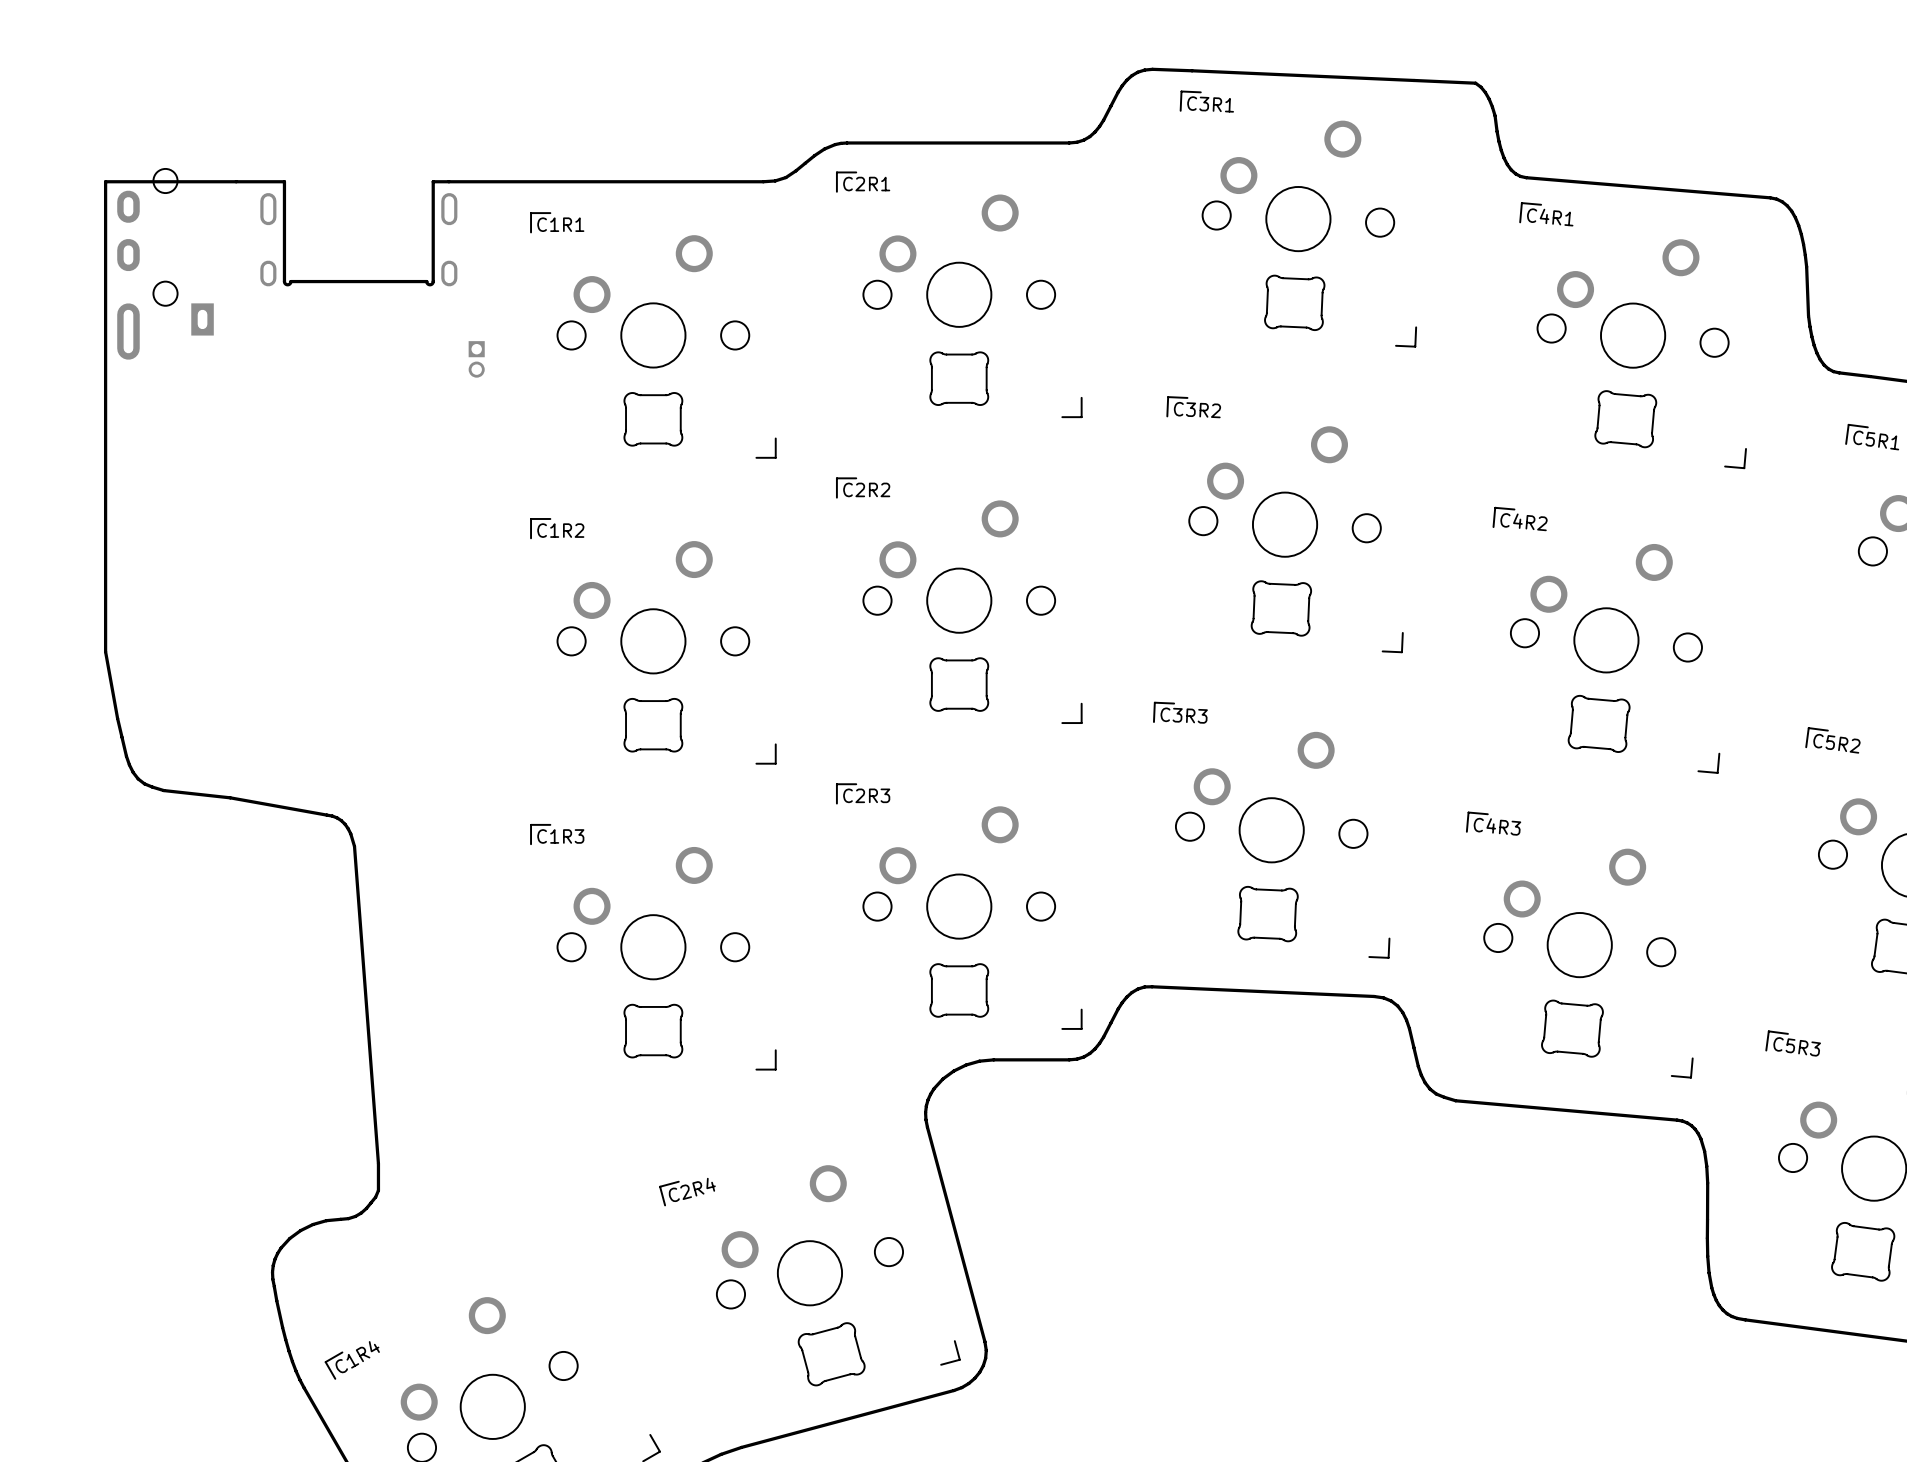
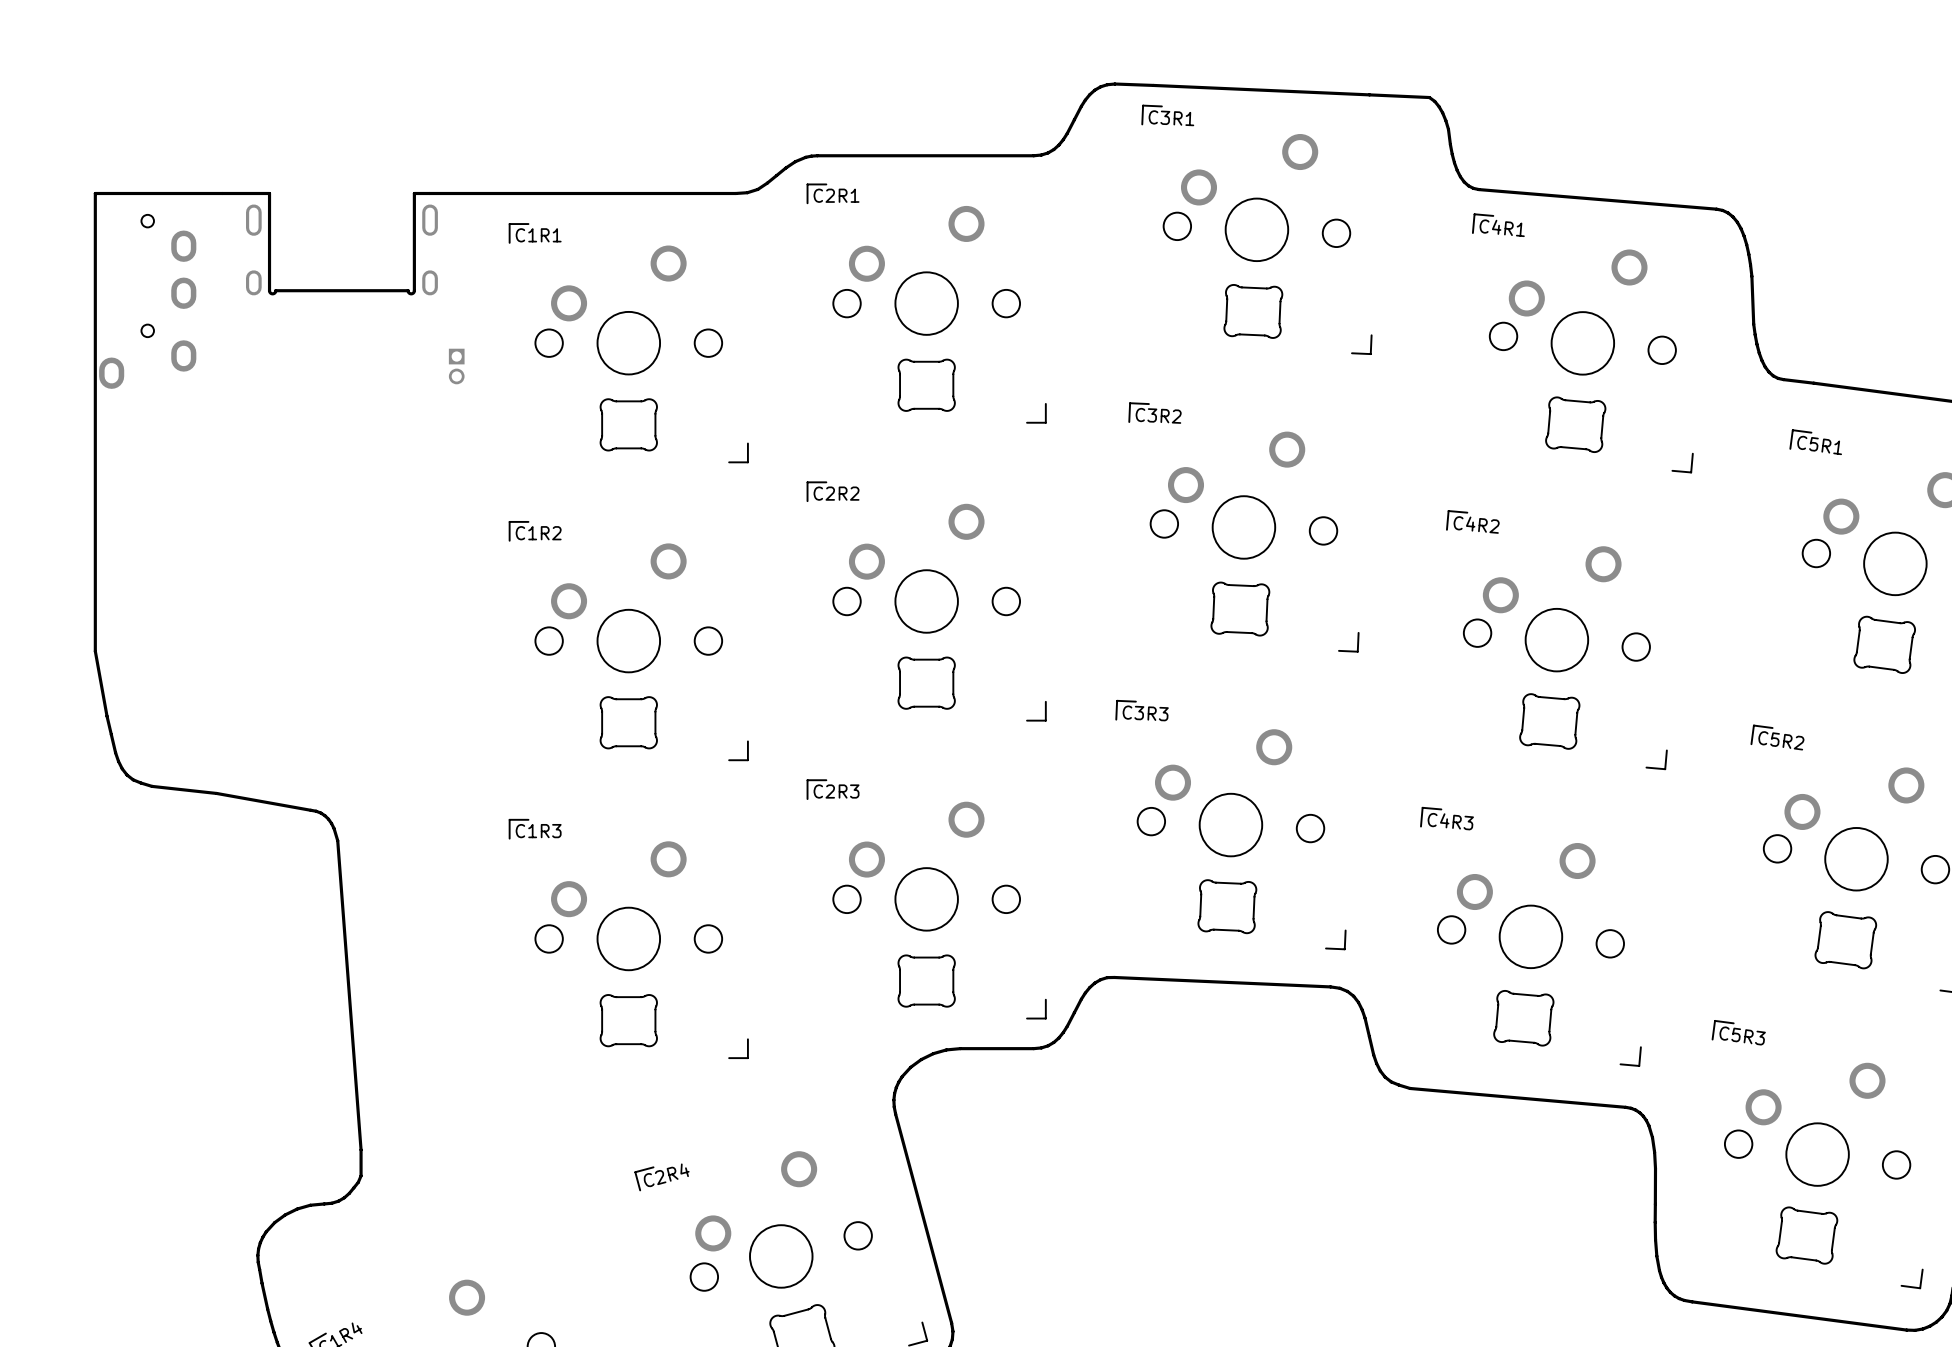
part: (165, 264) -> none
part: none -> (147, 301)

